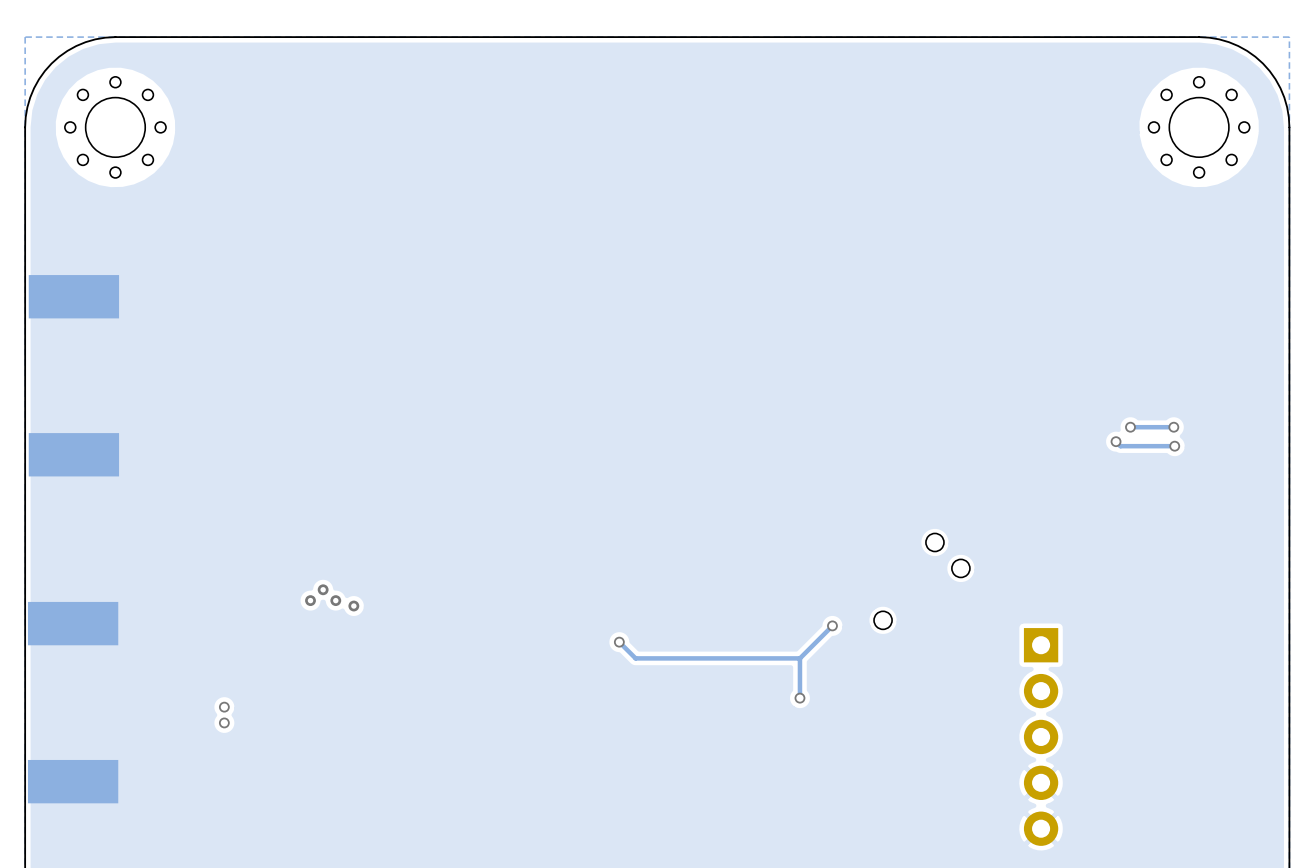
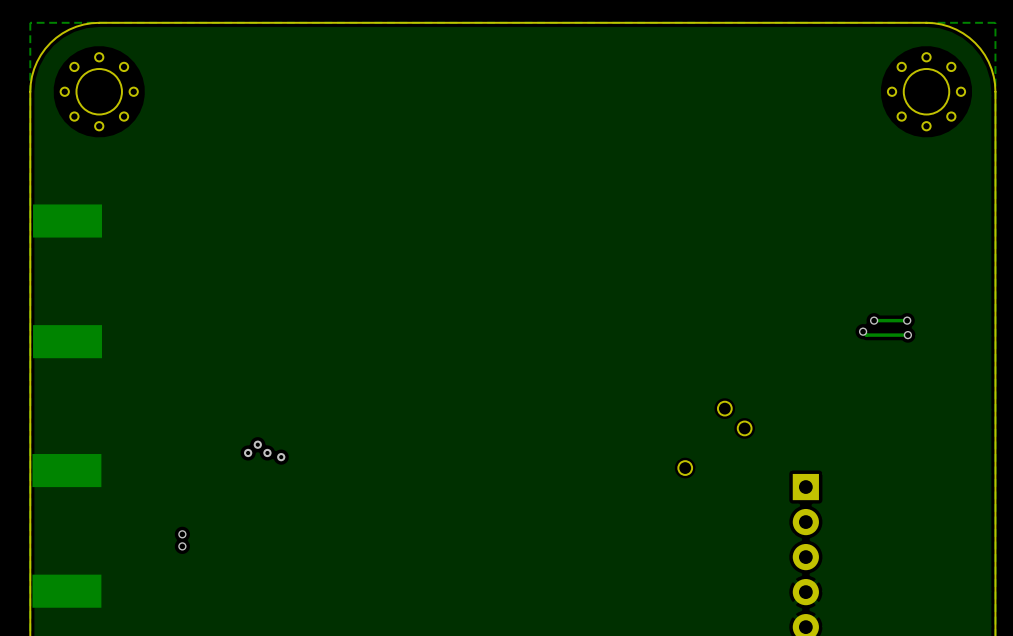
track: (832, 625) (799, 658) -> none
via: (832, 625) -> none
track: (619, 642) (635, 658) (799, 658) -> none
via: (619, 642) -> none
track: (799, 658) (799, 698) -> none
via: (799, 698) -> none

